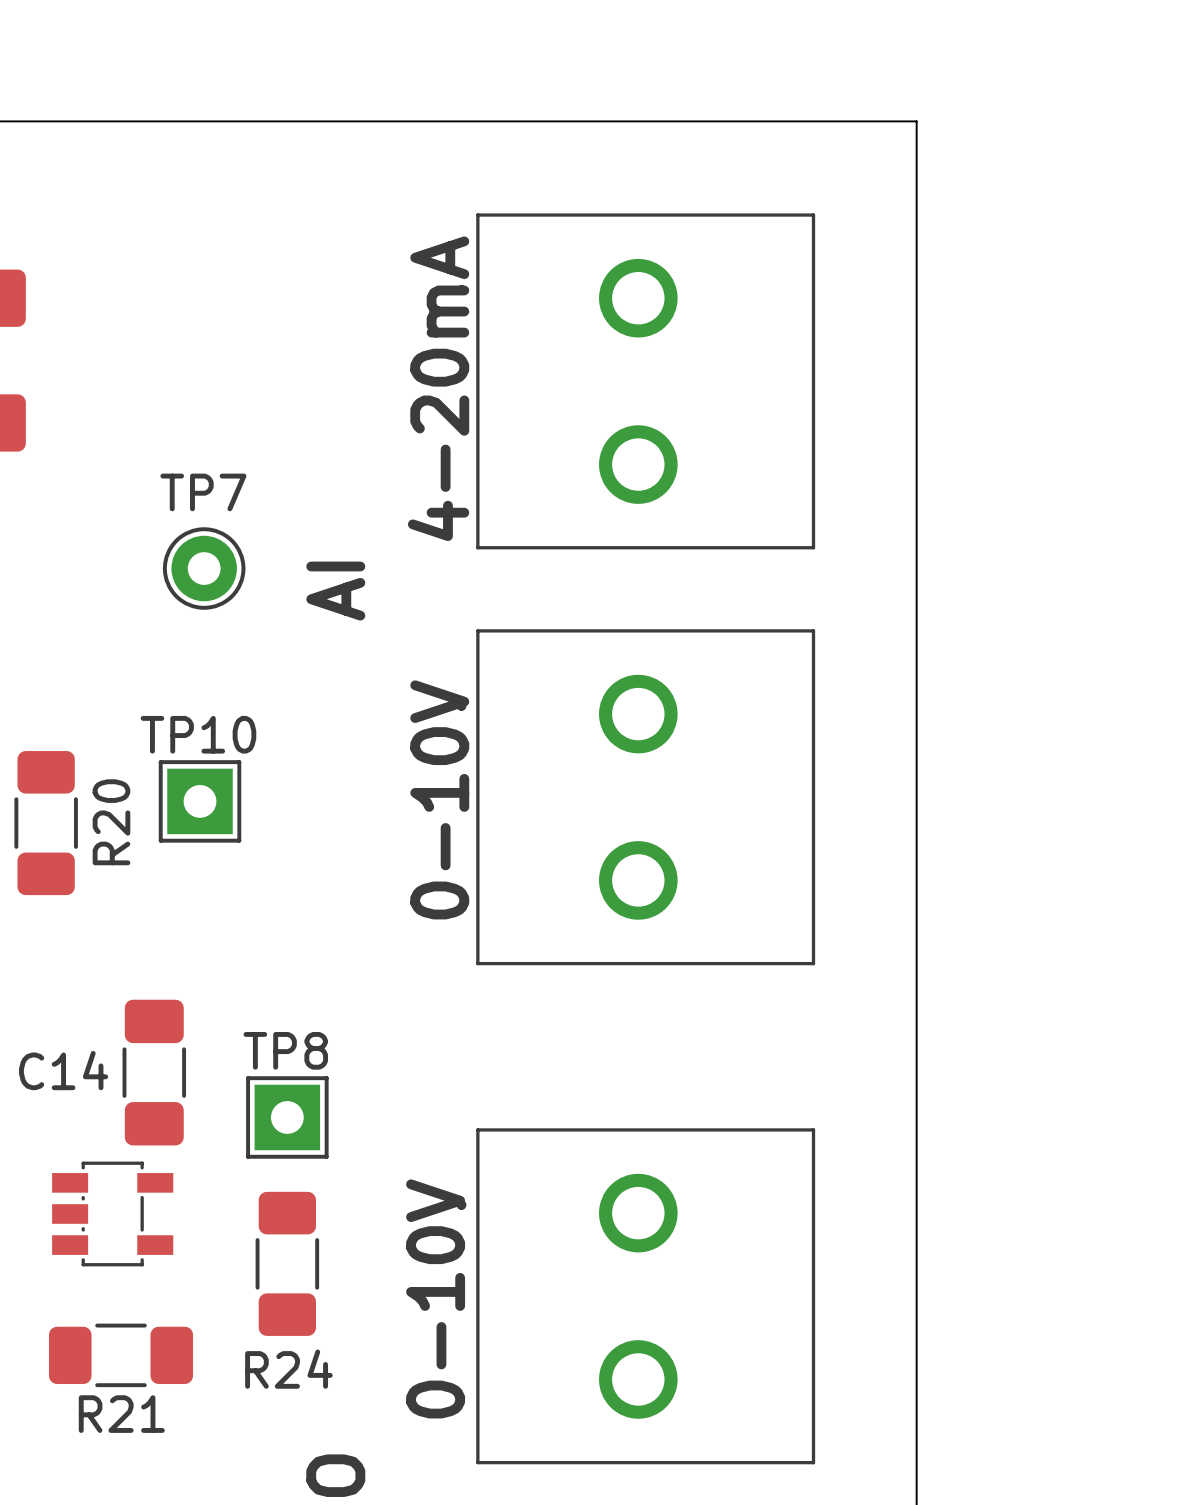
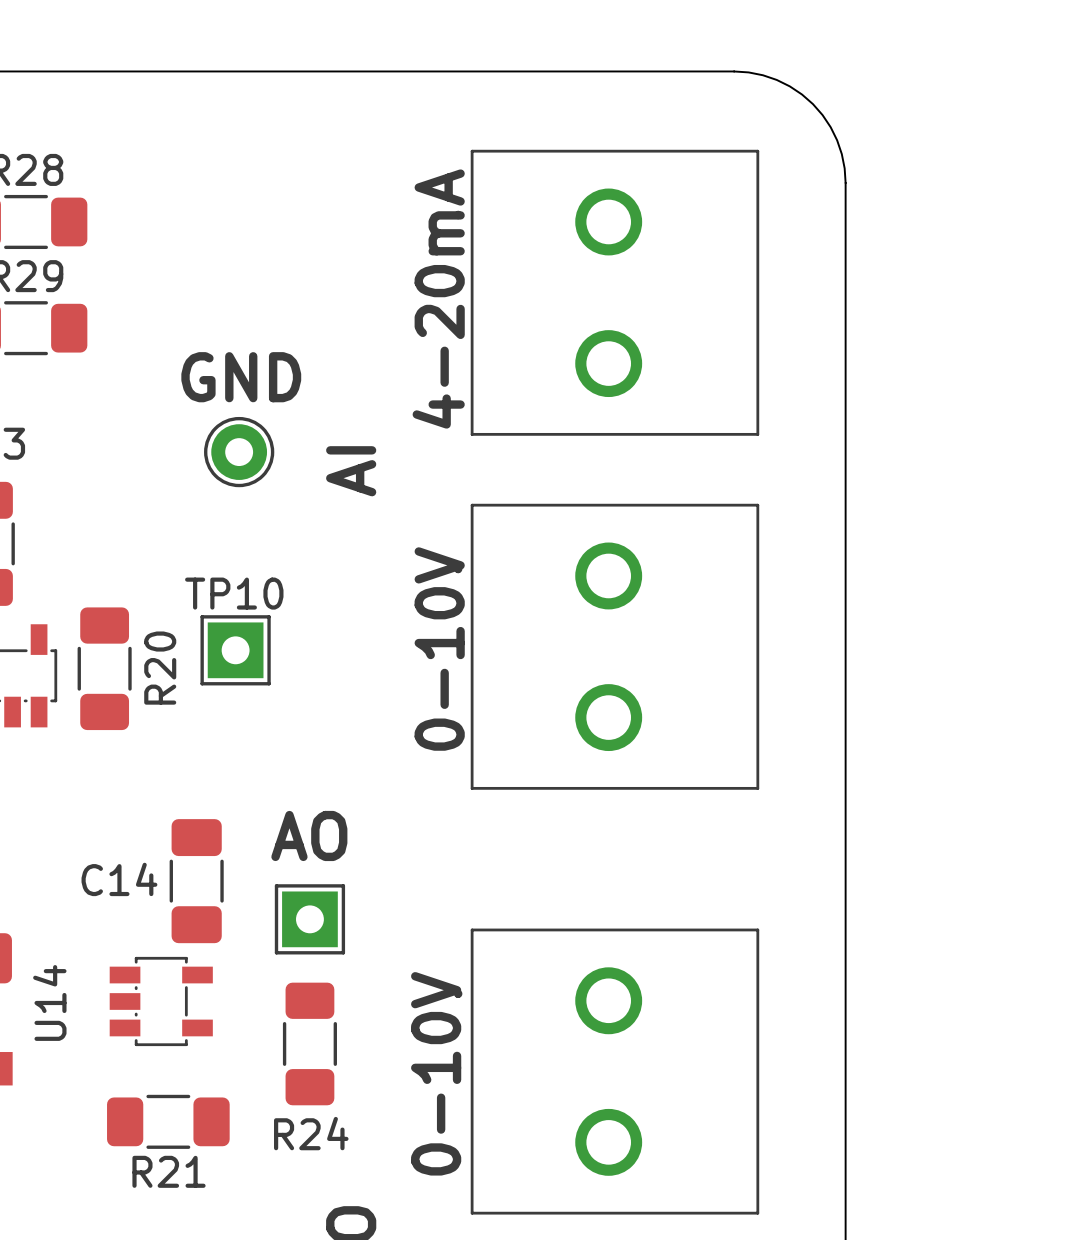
board edge: (785, 121) (916, 121) (916, 252) -> (734, 71) (748, 72) (776, 79) (802, 94) (812, 104) (830, 127) (837, 140) (841, 154) (845, 182)
text: none -> GND (241, 377)
TP7 name: TP7 (203, 492) -> none
text: none -> AO (309, 835)
TP8 name: TP8 (285, 1050) -> none

